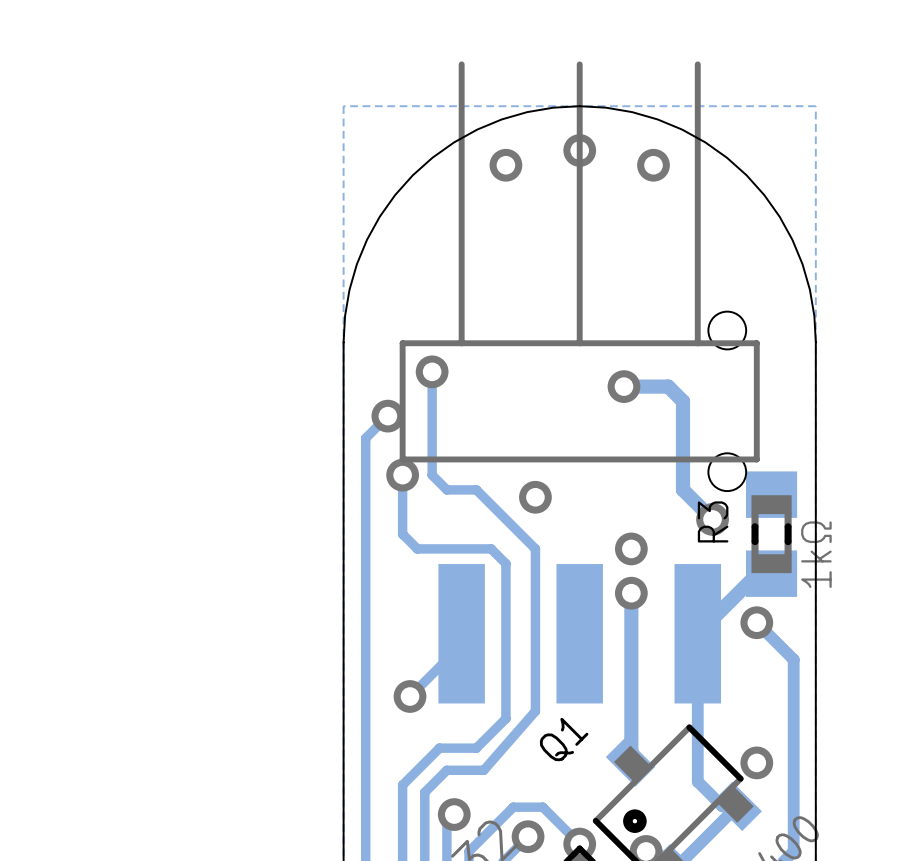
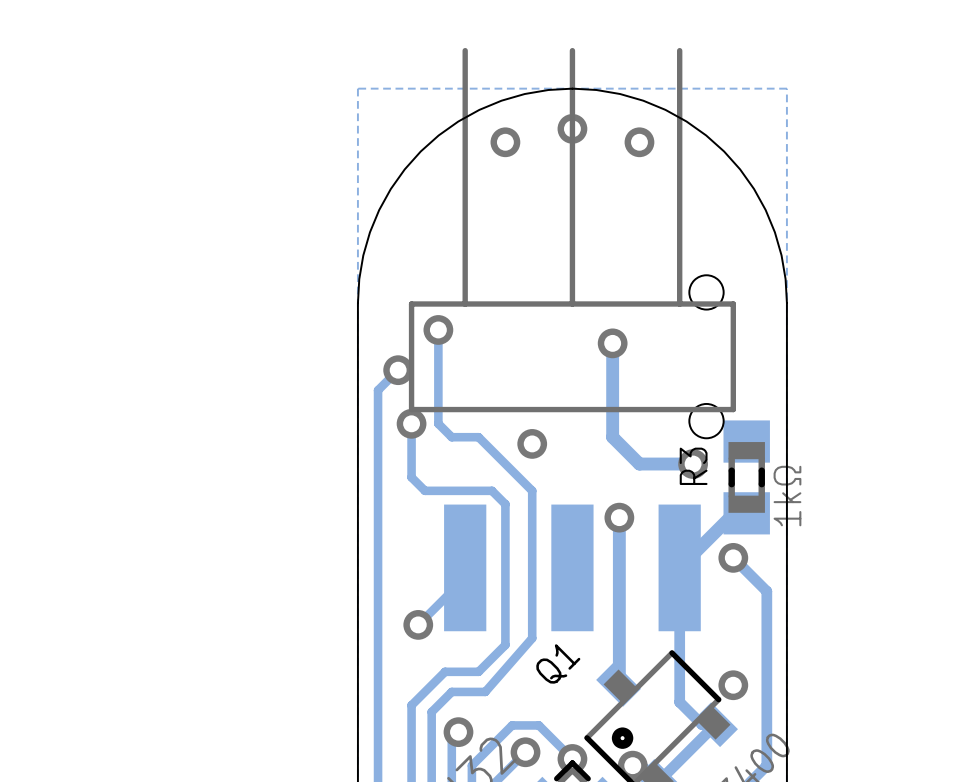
track: (623, 386) (668, 386) (683, 401) (683, 489) (712, 519) -> (612, 343) (612, 437) (639, 464) (693, 464)
via: (631, 548) -> none
via: none -> (619, 517)
via: (631, 593) -> none

